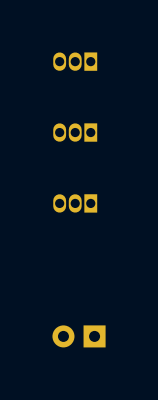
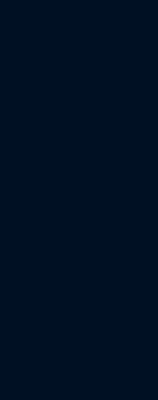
part: (75, 61) -> none
part: (75, 132) -> none
part: (75, 203) -> none
part: (79, 336) -> none

